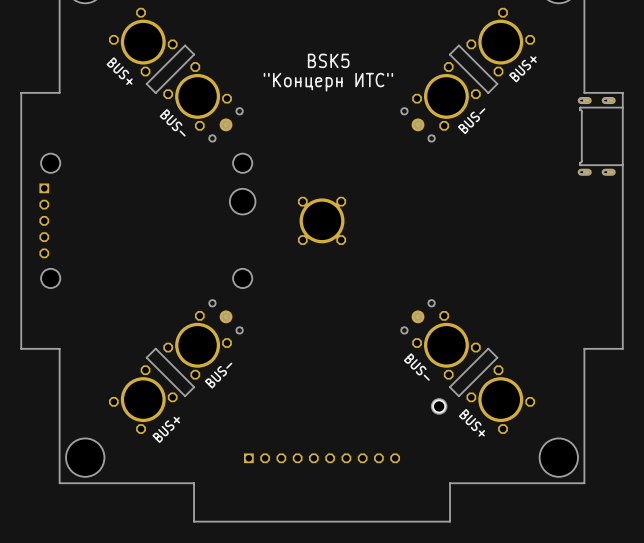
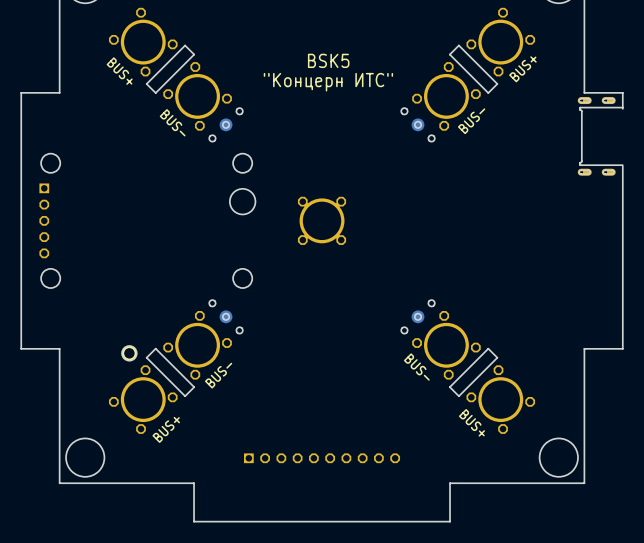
board edge: (622, 108) (622, 166) -> none
part: none -> (129, 353)
part: (439, 406) -> none

